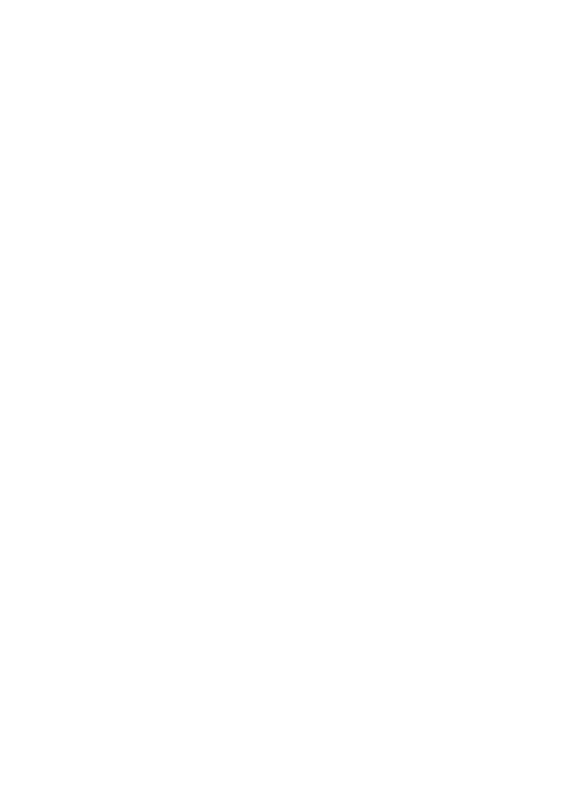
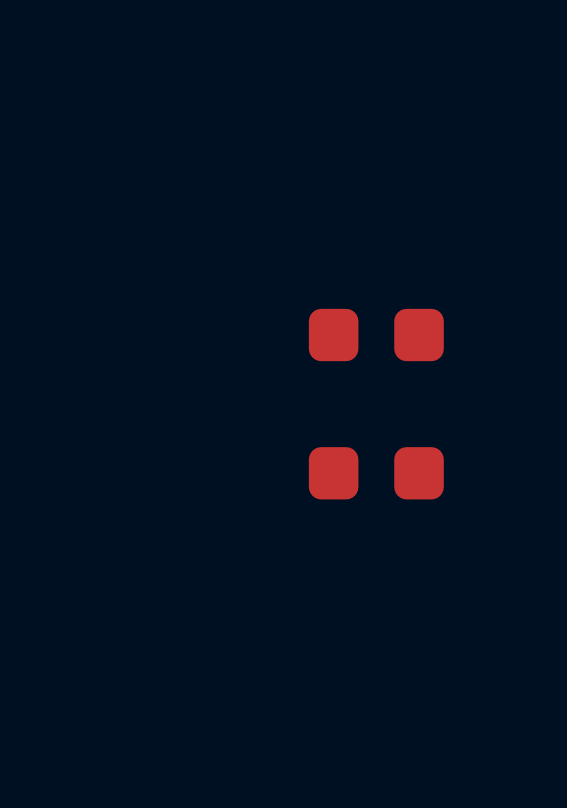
part: none -> (376, 335)
part: none -> (376, 473)

